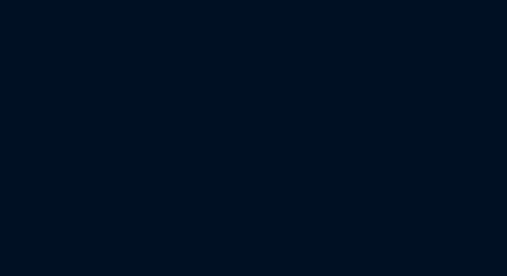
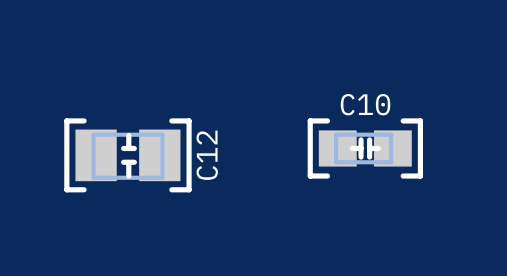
C10: none -> (365, 148)
C12: none -> (127, 155)

